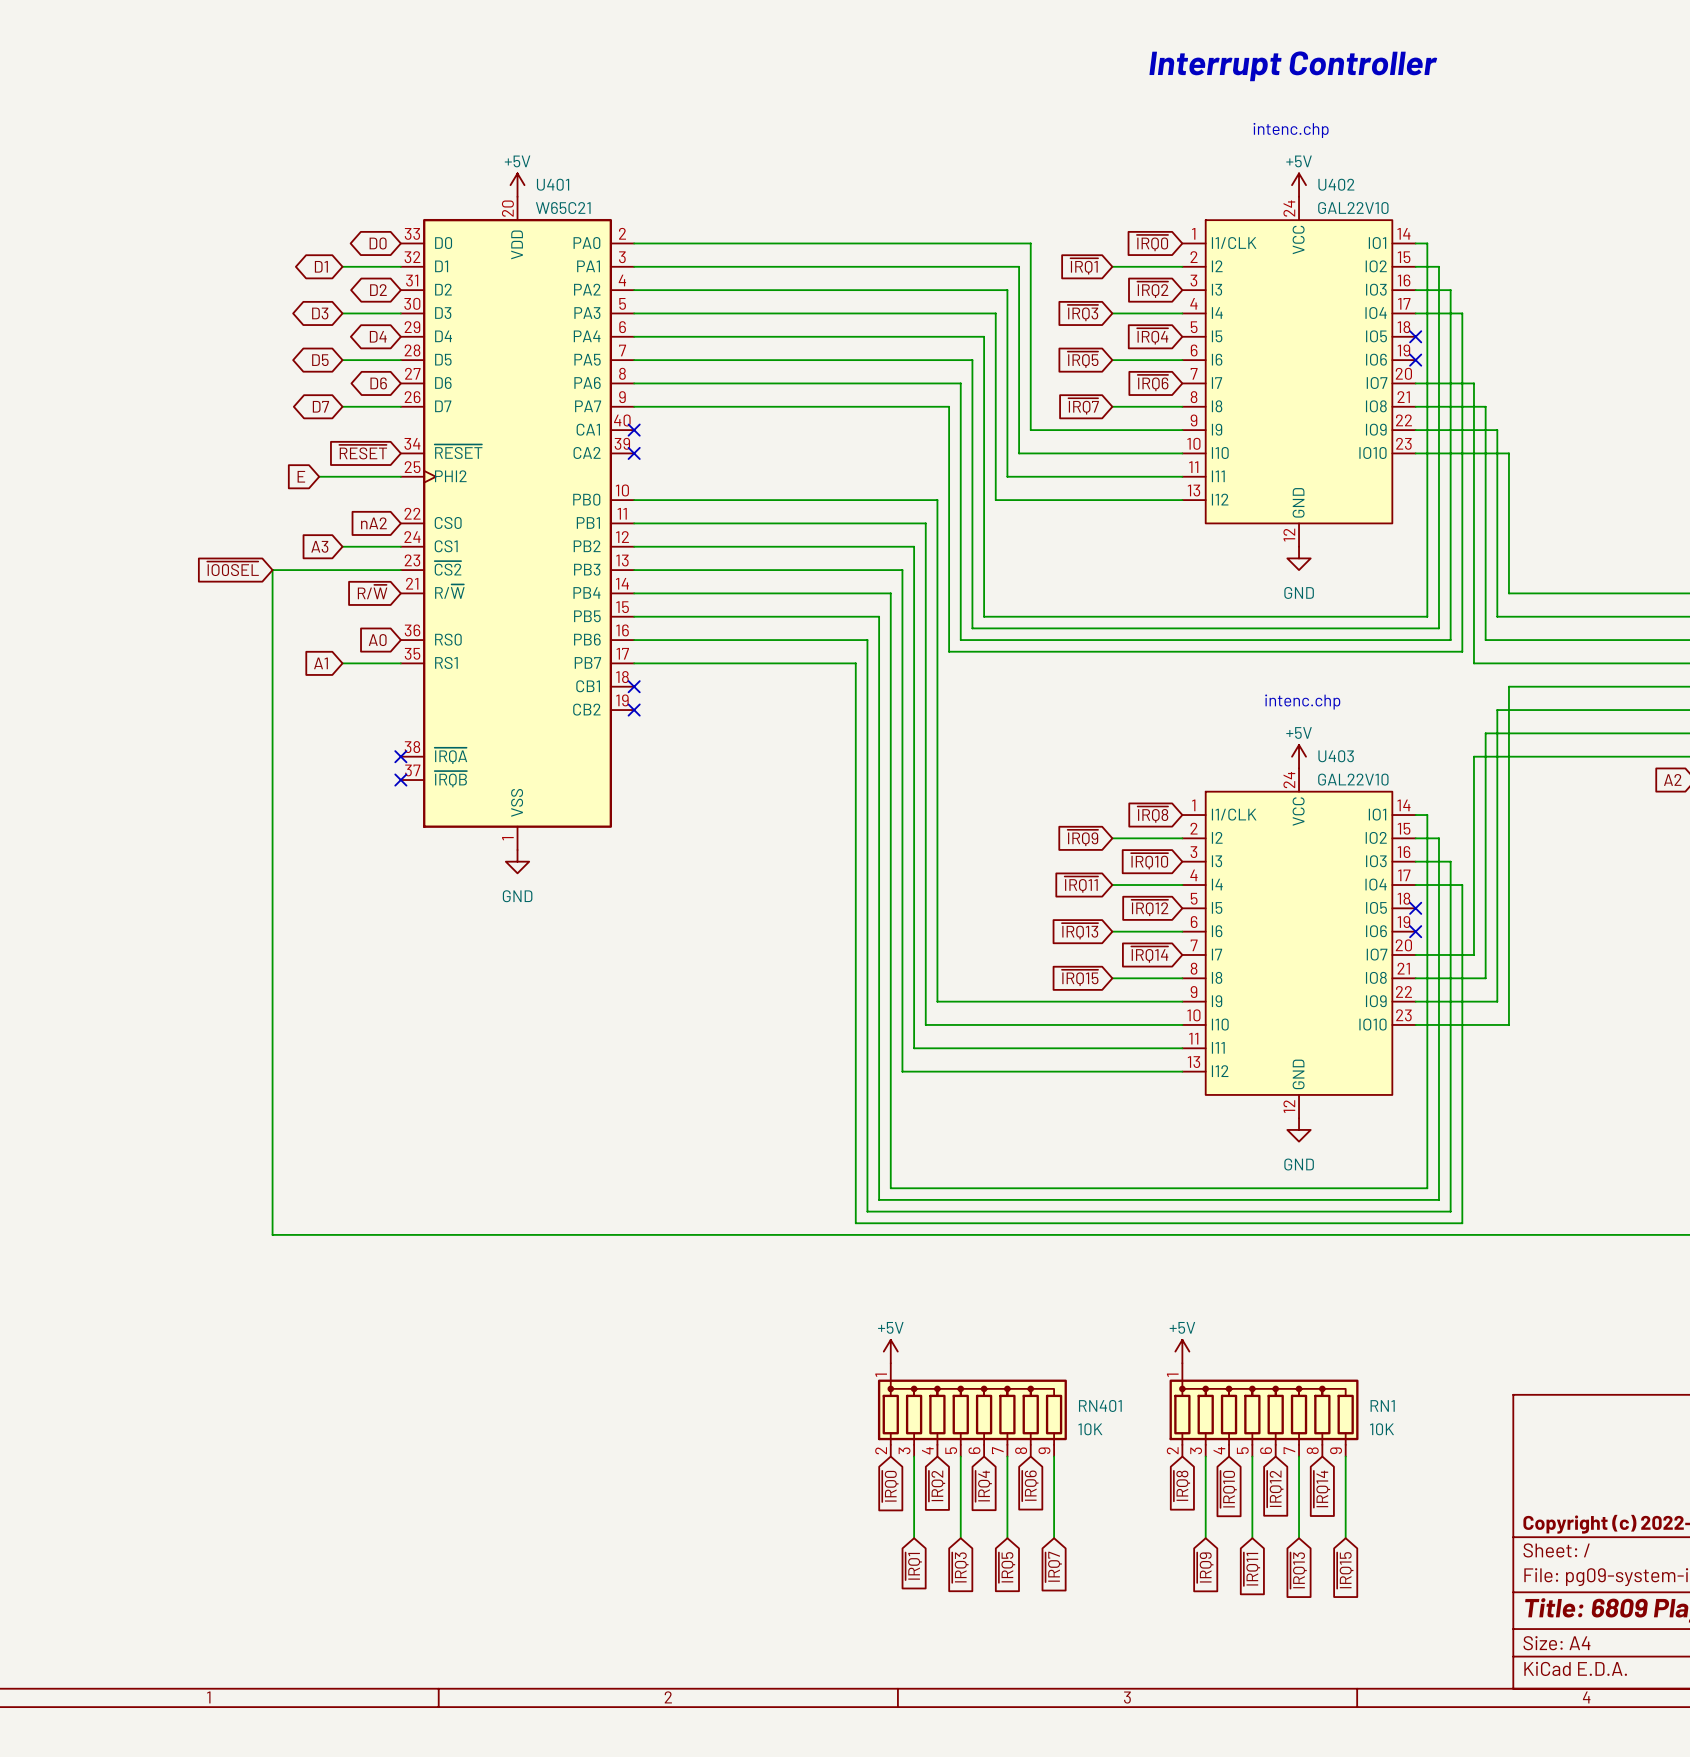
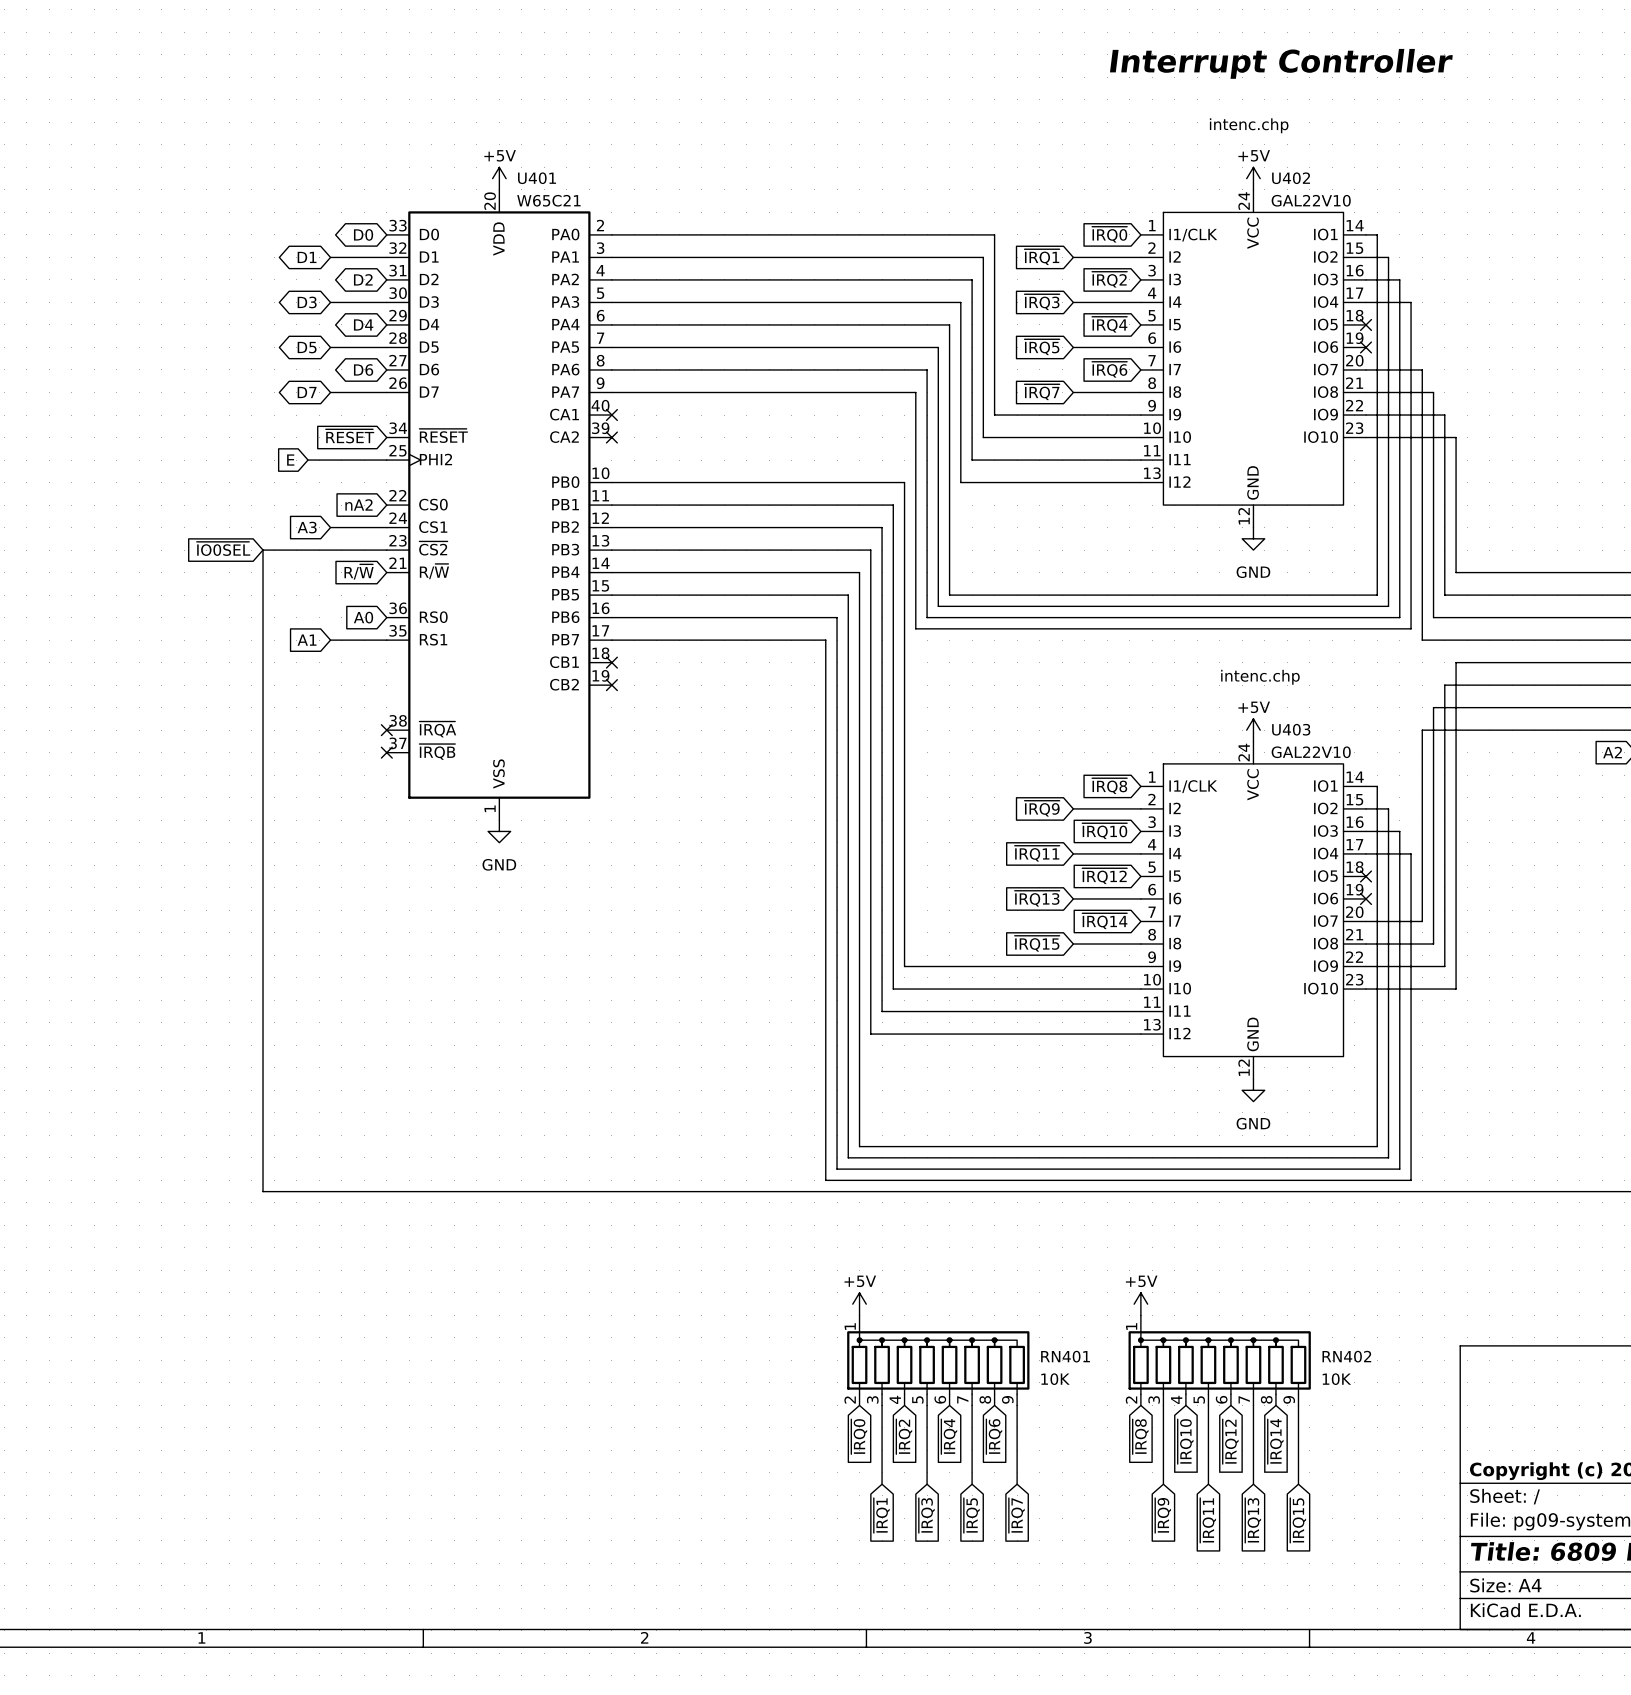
RN1 name: RN1 (1382, 1405) -> RN402 (1346, 1356)

